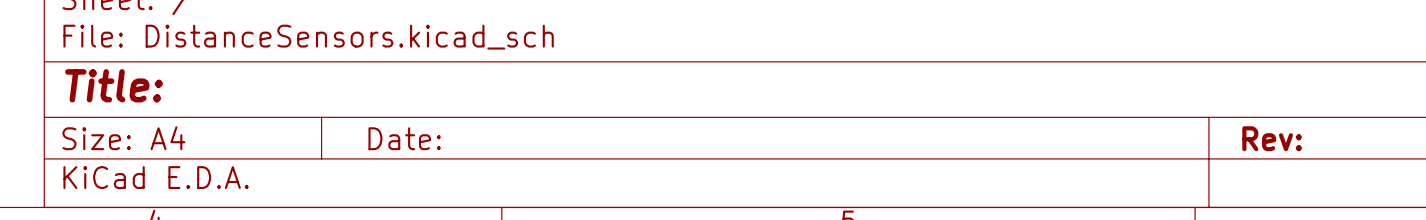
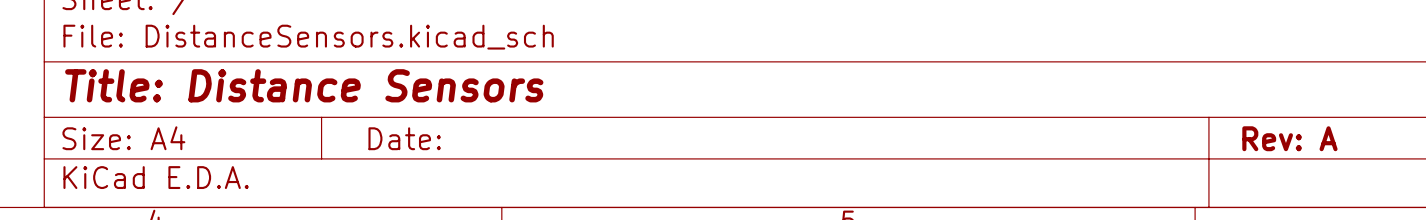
title block: Title: (114, 85) -> Title: Distance Sensors (304, 85)
title block: Rev: (1272, 138) -> Rev: A (1289, 138)

